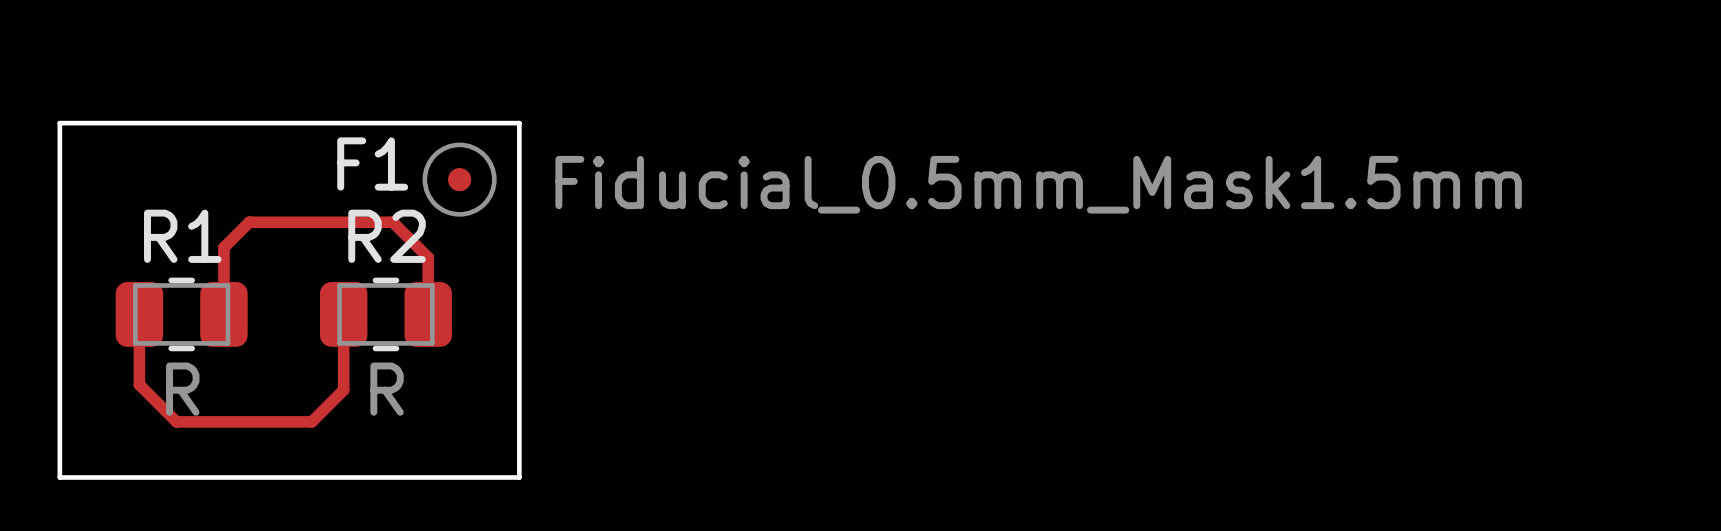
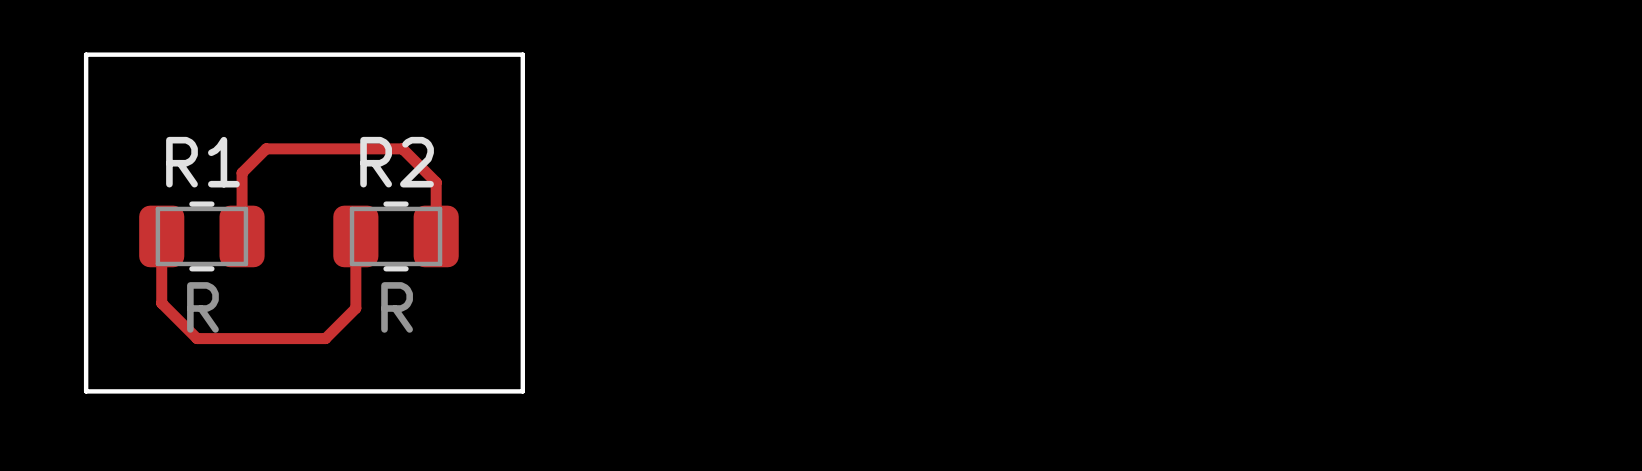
F1: Fiducial_0.5mm_Mask1.5mm (459, 179) -> none

